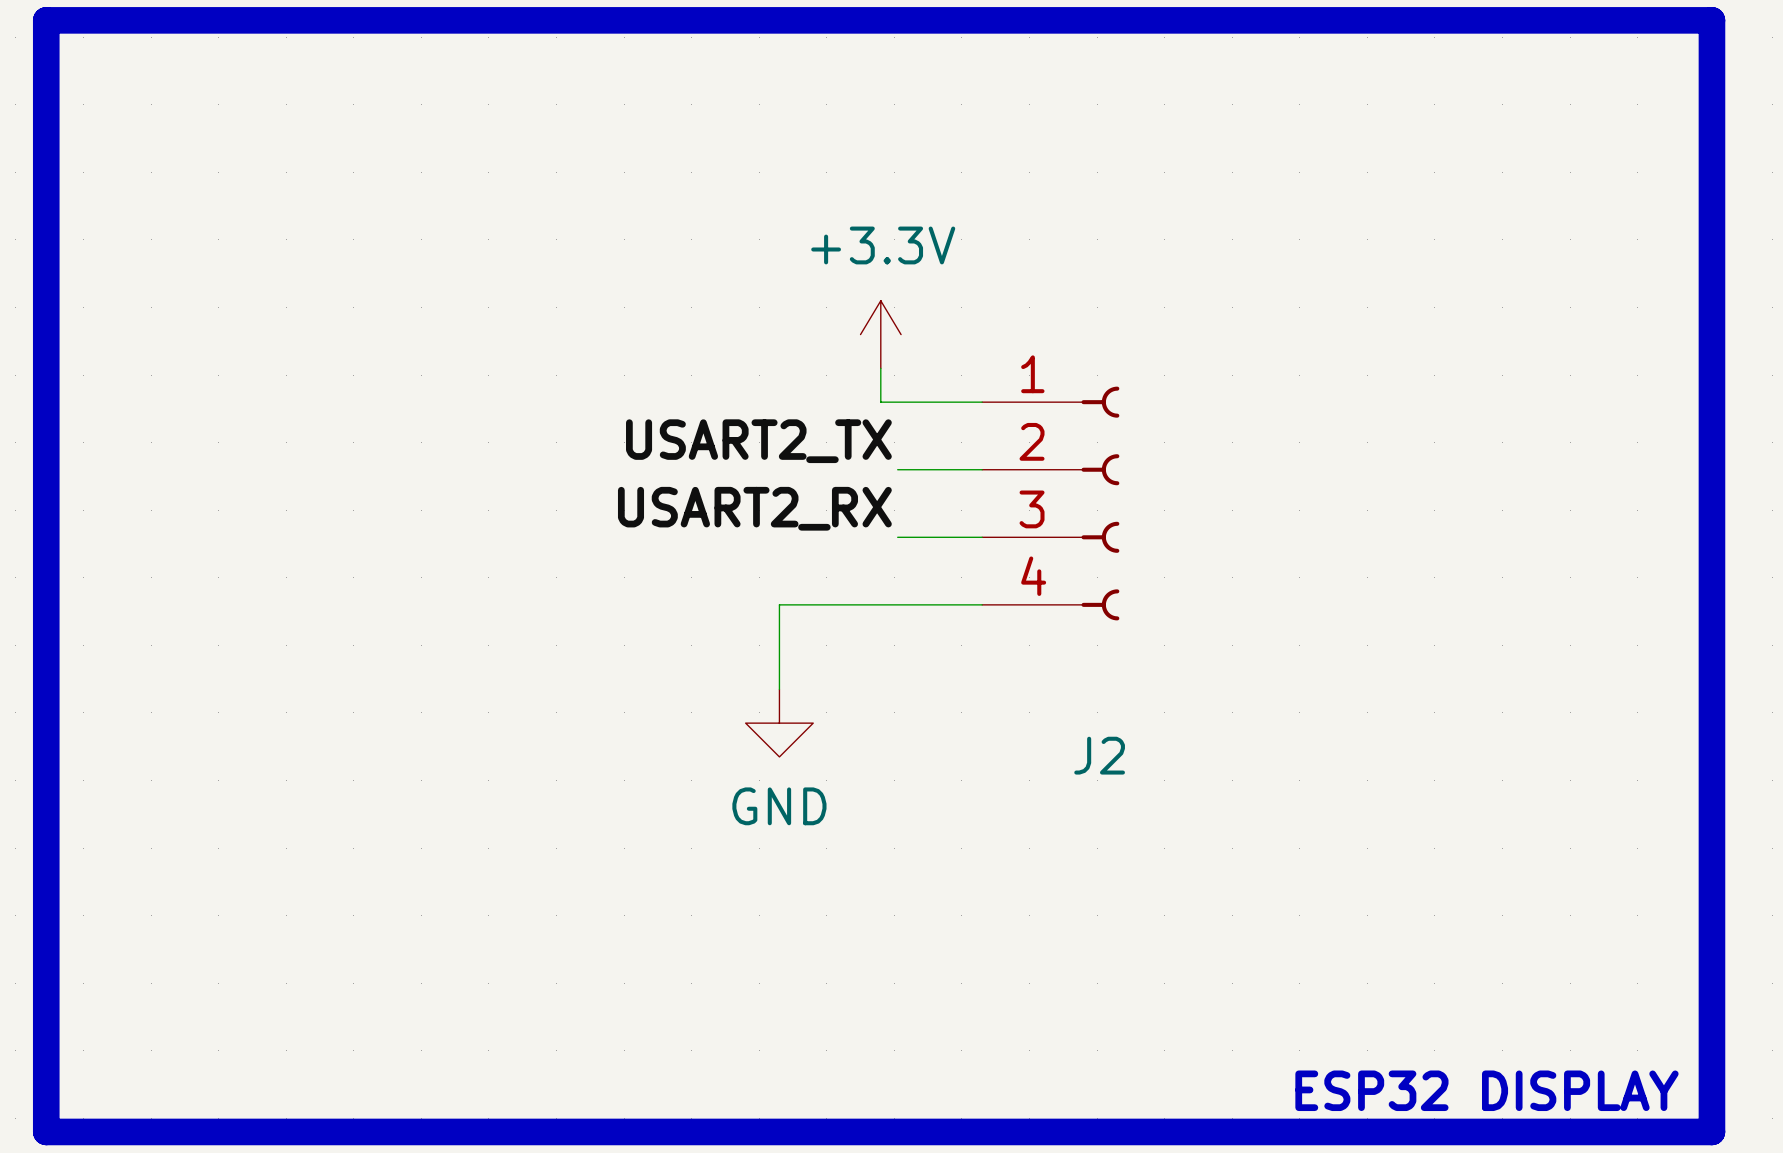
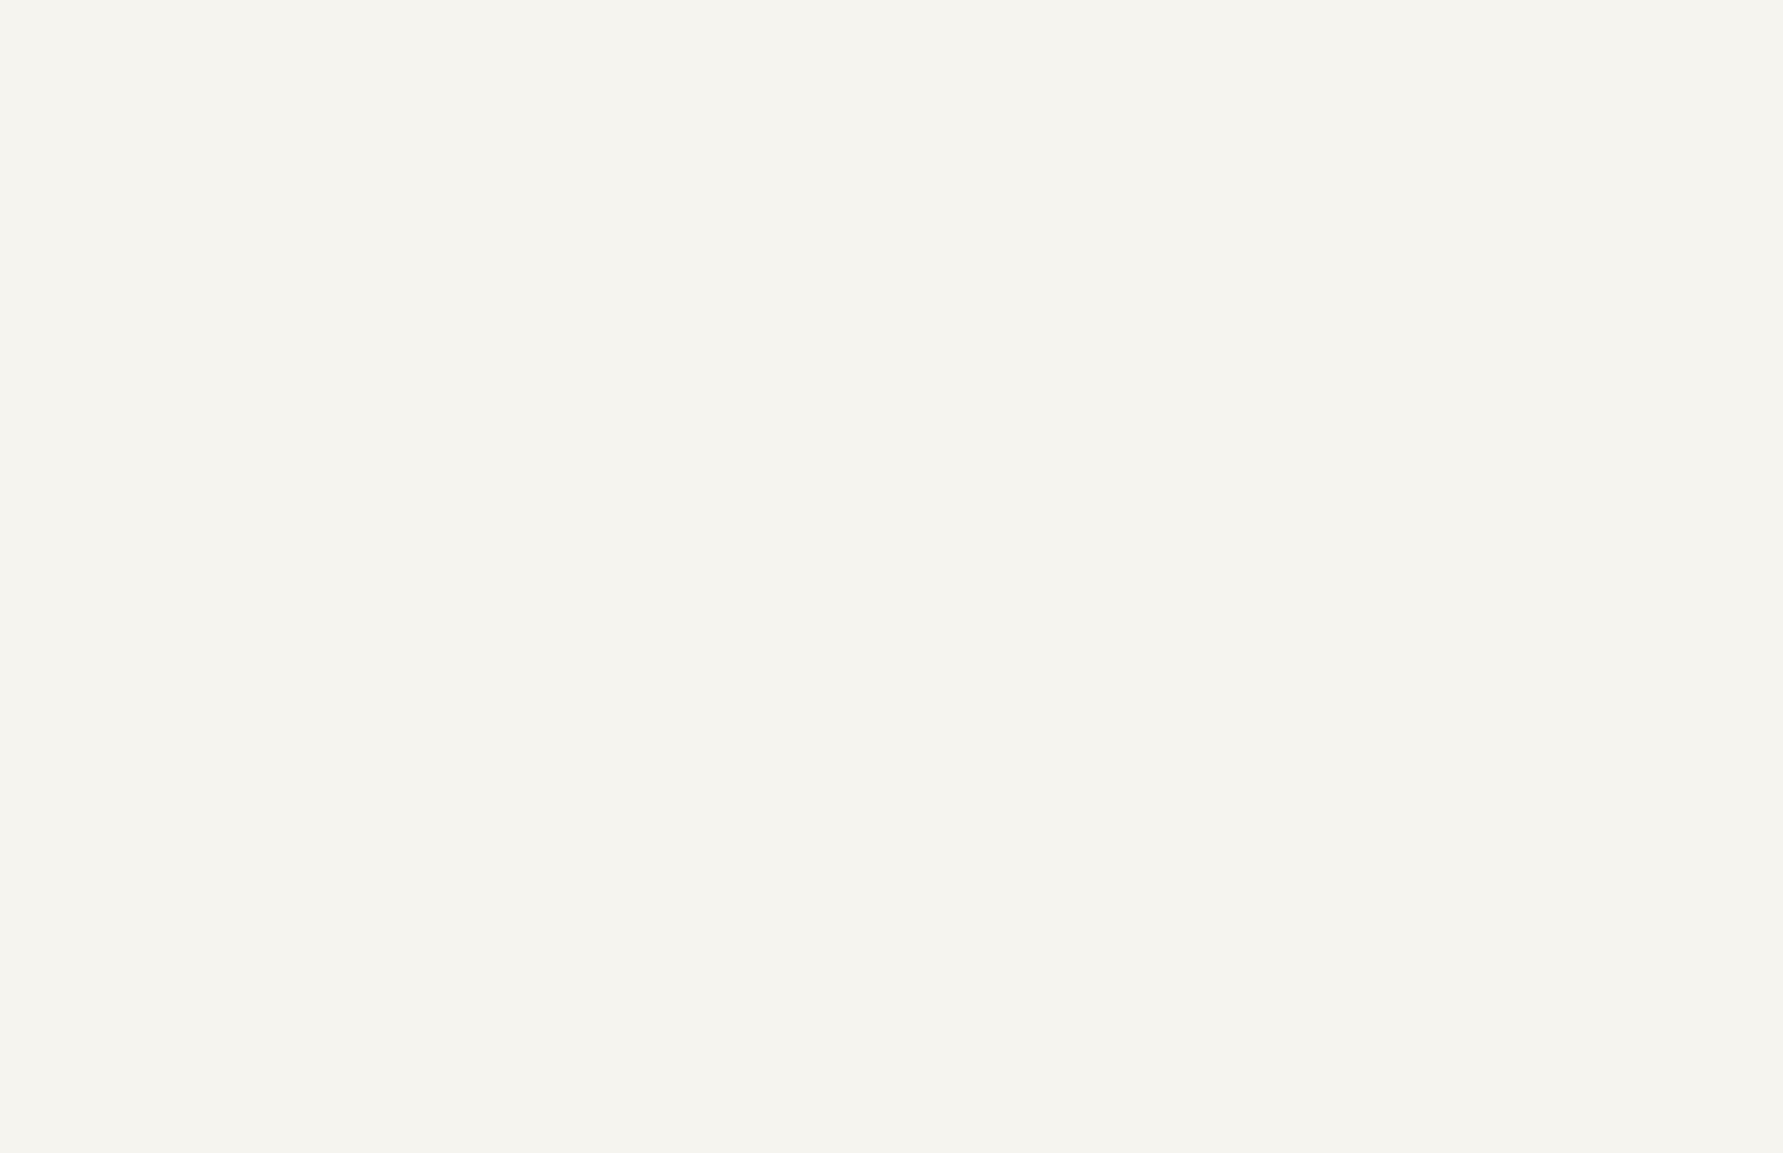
line: (46, 20) (1711, 20) (1711, 1131) (46, 1131) (46, 20) -> none
power symbol: +3.3V (880, 334) -> none
wire: (880, 368) (880, 402) (982, 402) -> none
label: USART2_TX (758, 441) -> none
wire: (897, 469) (982, 469) -> none
J2: (1050, 503) -> none
label: USART2_RX (754, 508) -> none
wire: (897, 537) (982, 537) -> none
wire: (982, 604) (779, 604) (779, 689) -> none
power symbol: GND (779, 723) -> none
text: ESP32 DISPLAY (1486, 1090) -> none

